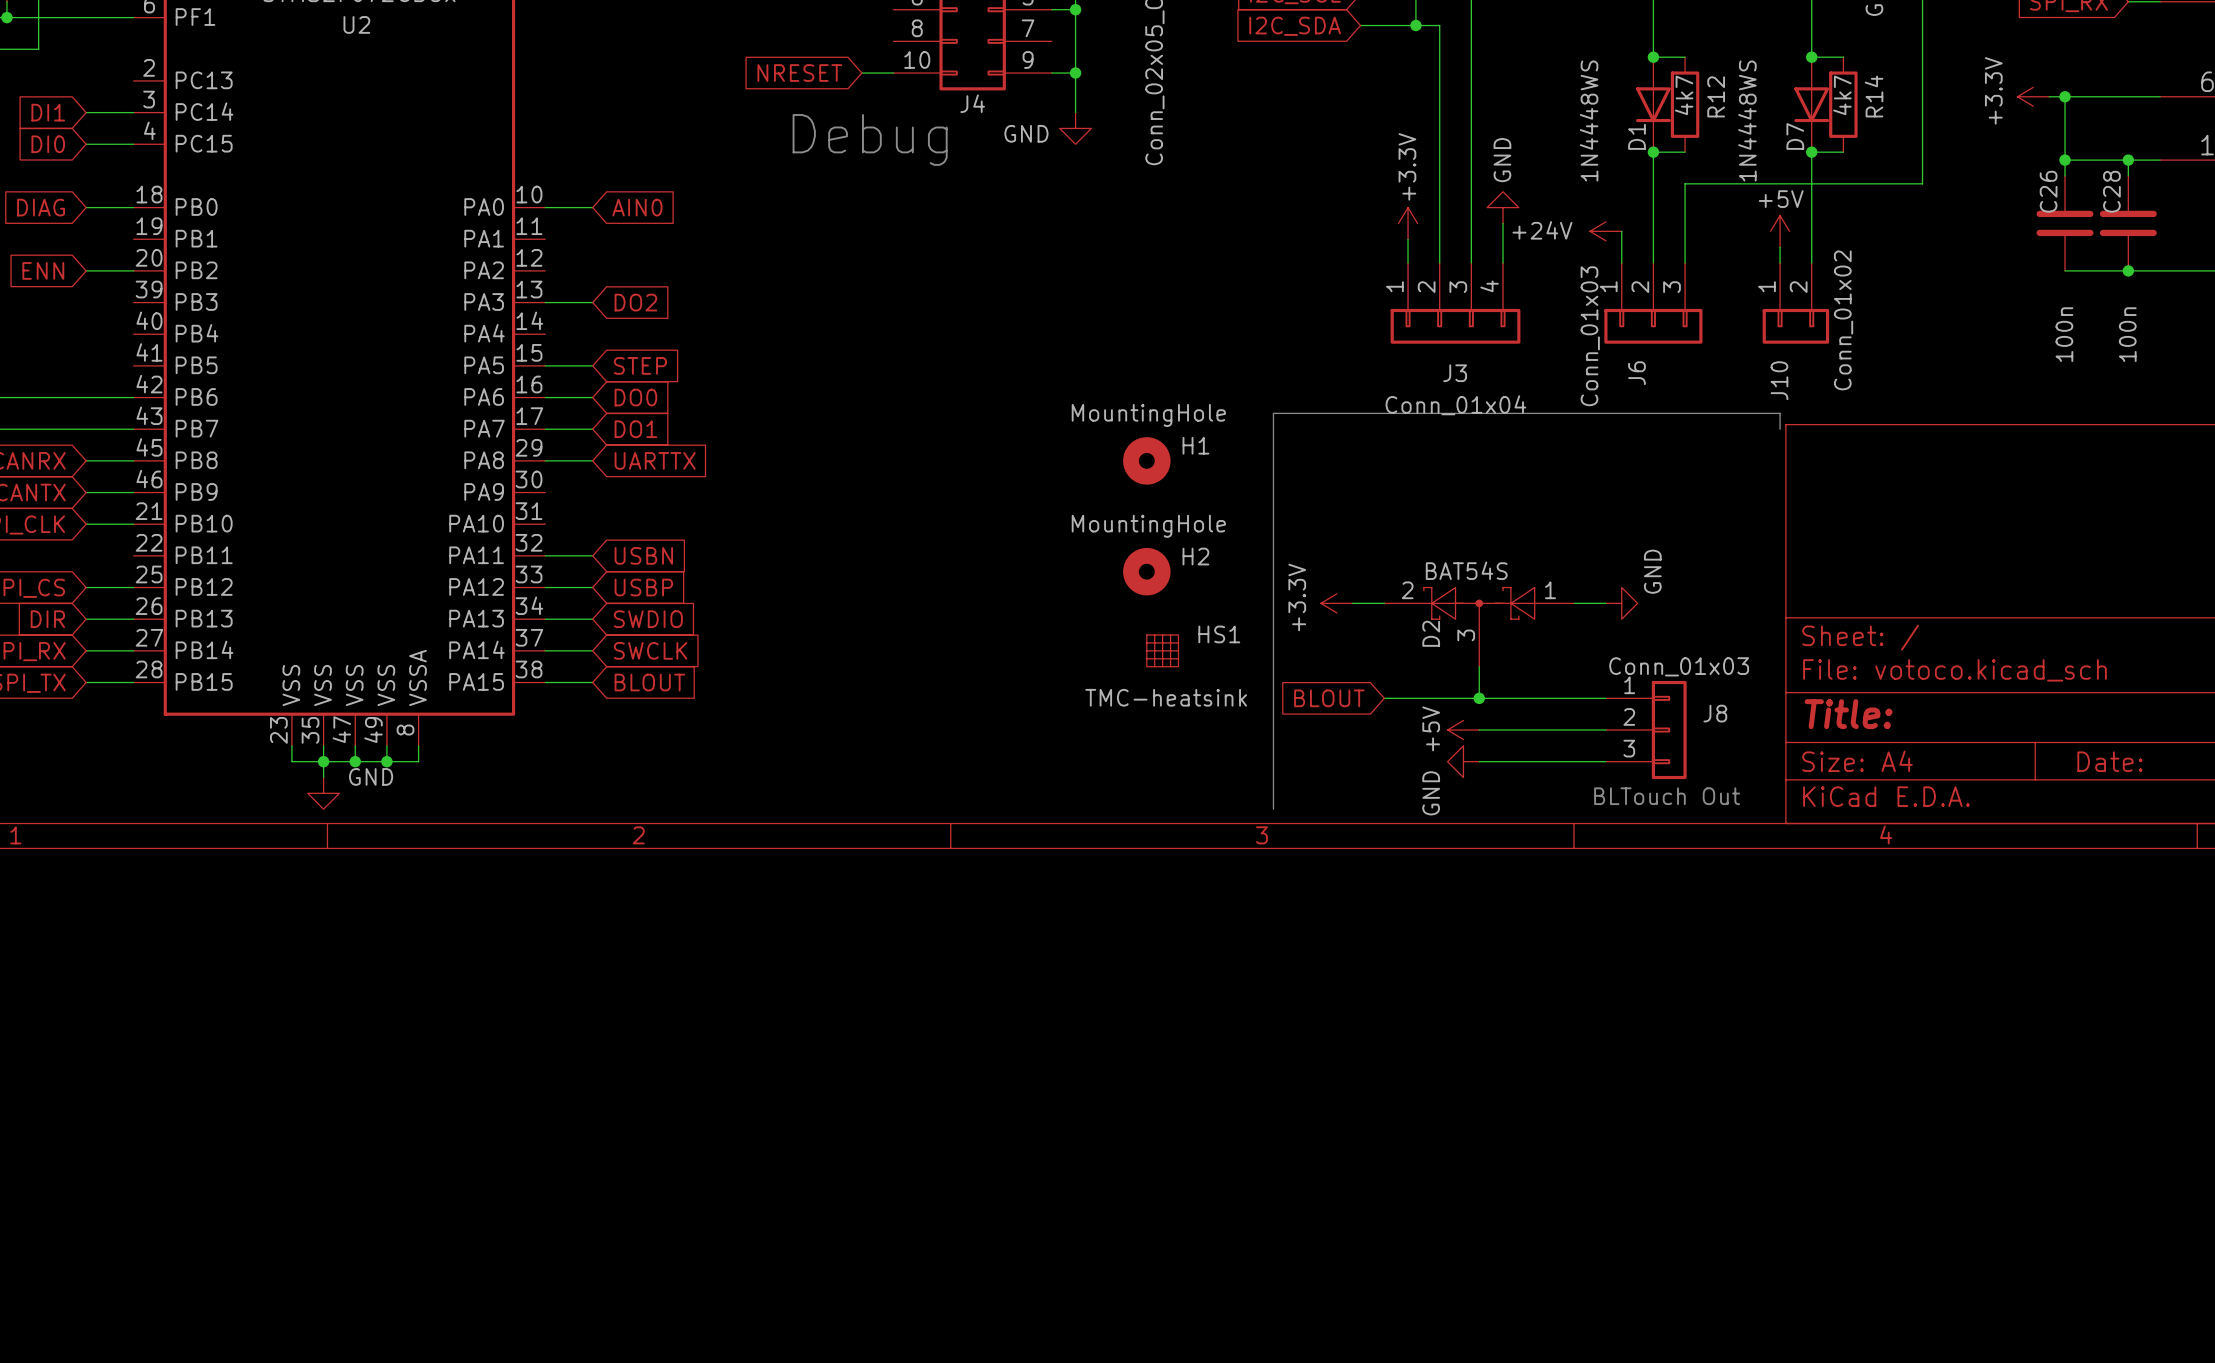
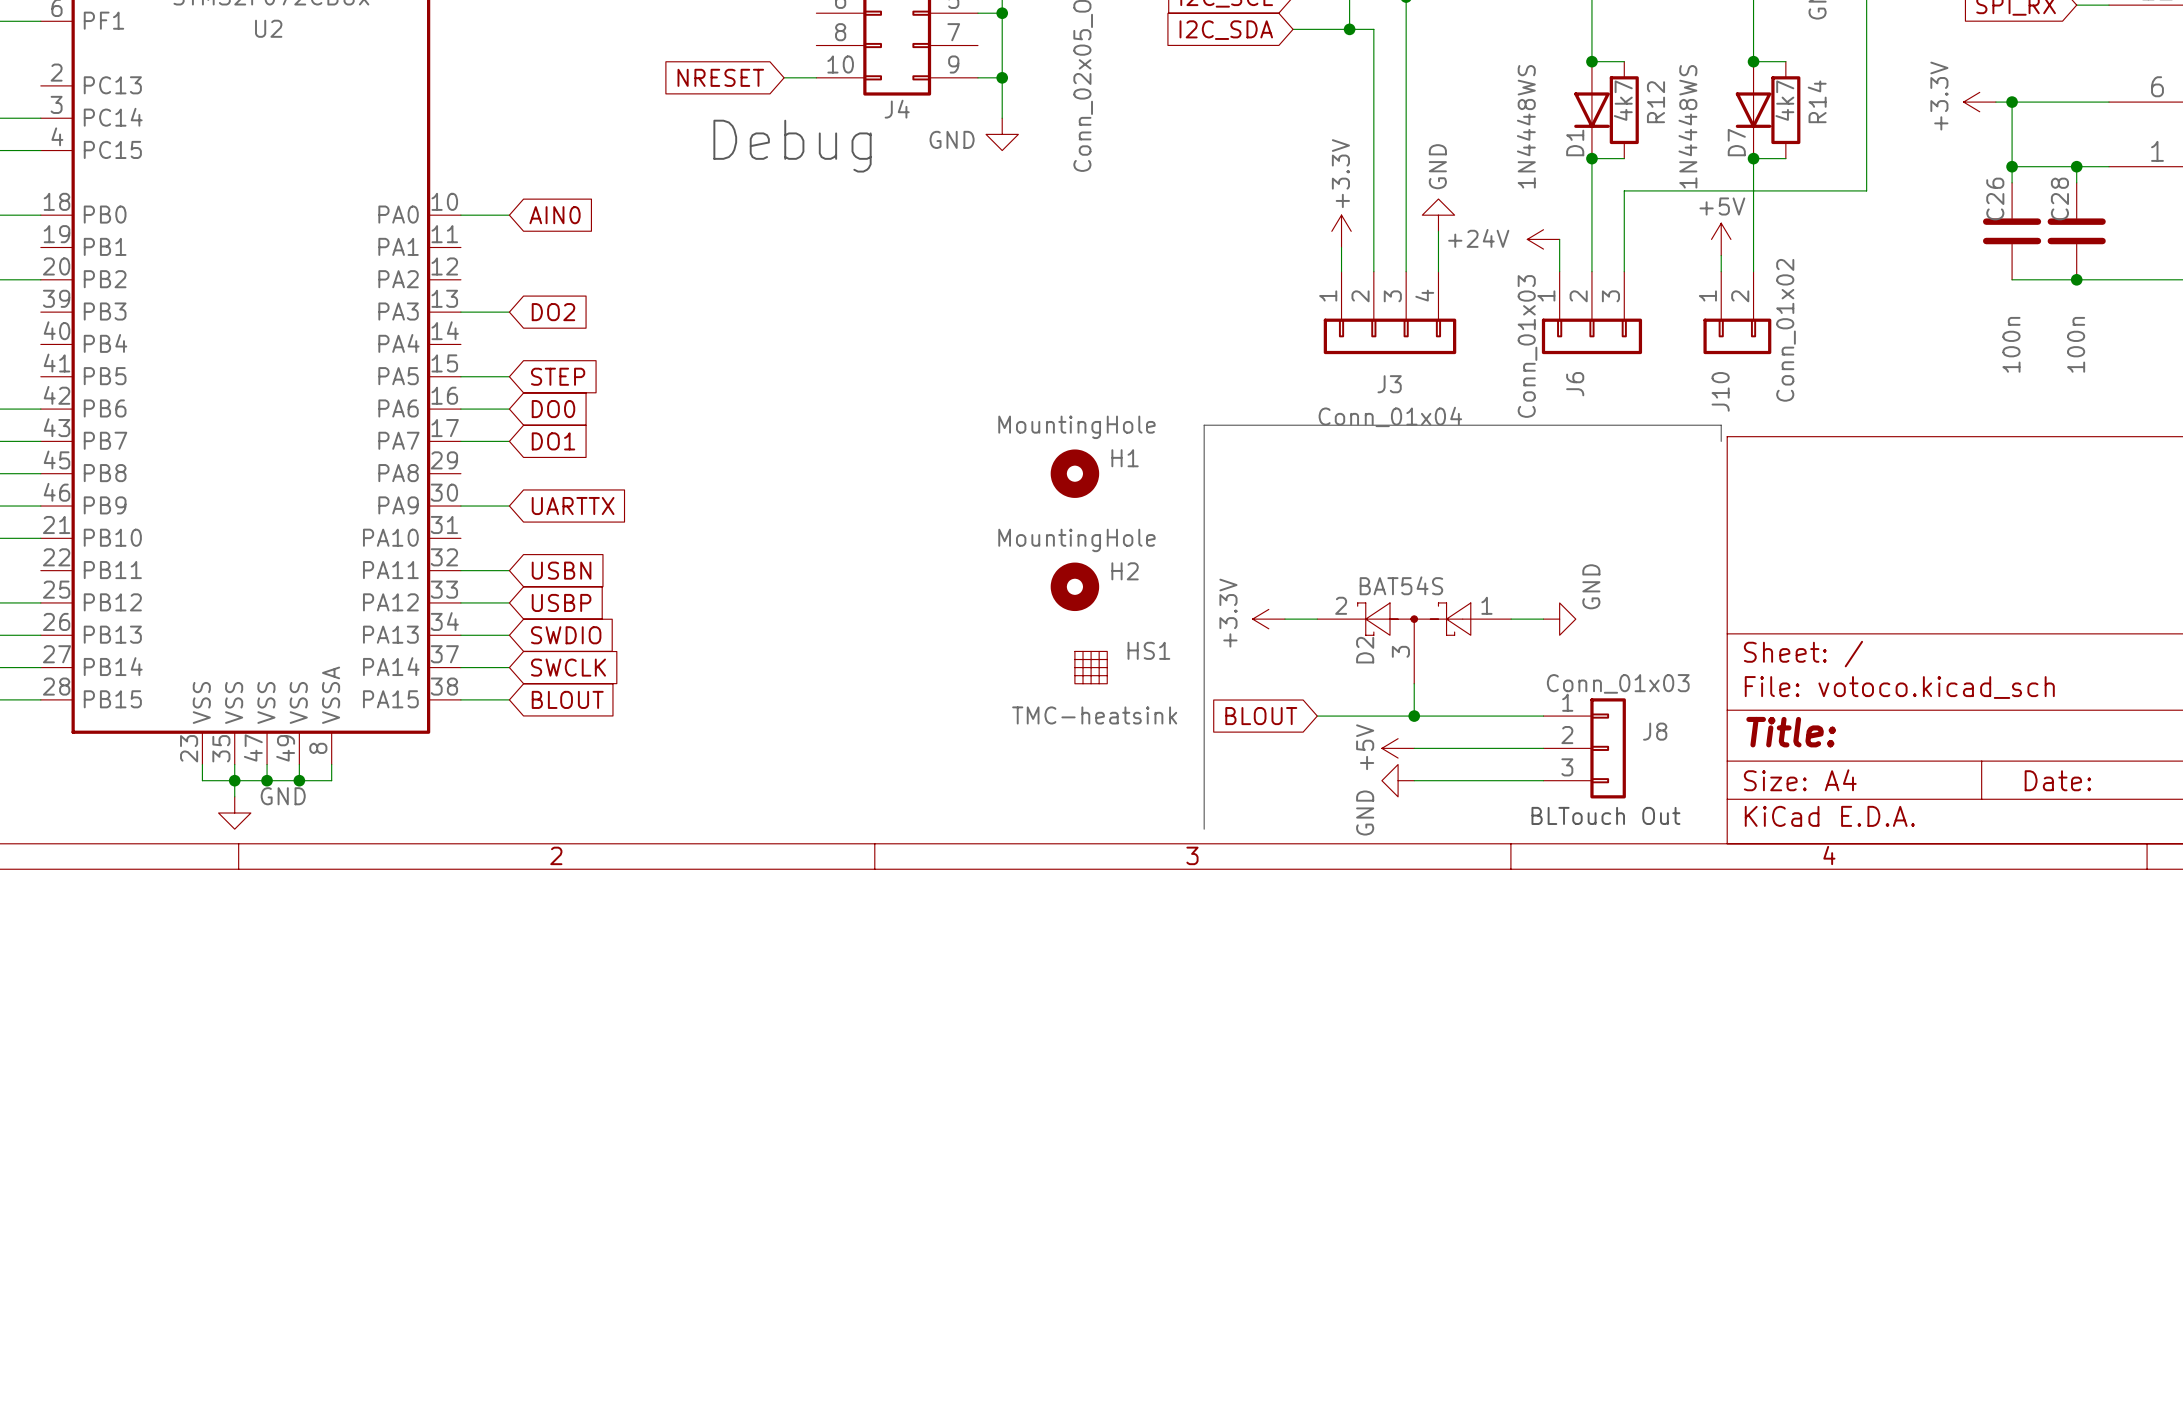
wire: (545, 460) (592, 460) -> (460, 506) (509, 506)
global label position: UARTTX (655, 460) -> UARTTX (573, 506)

